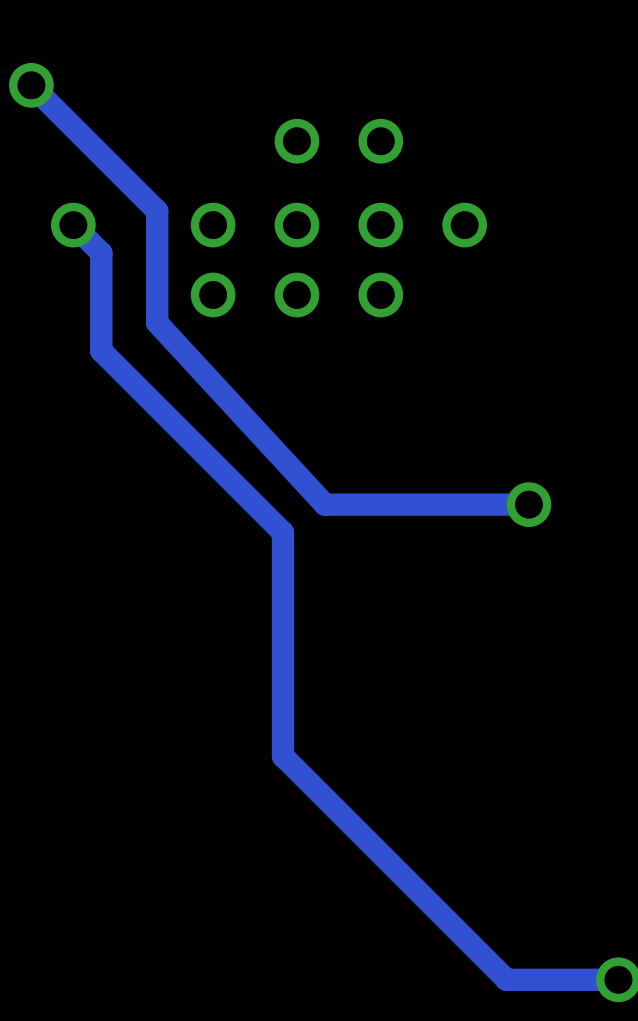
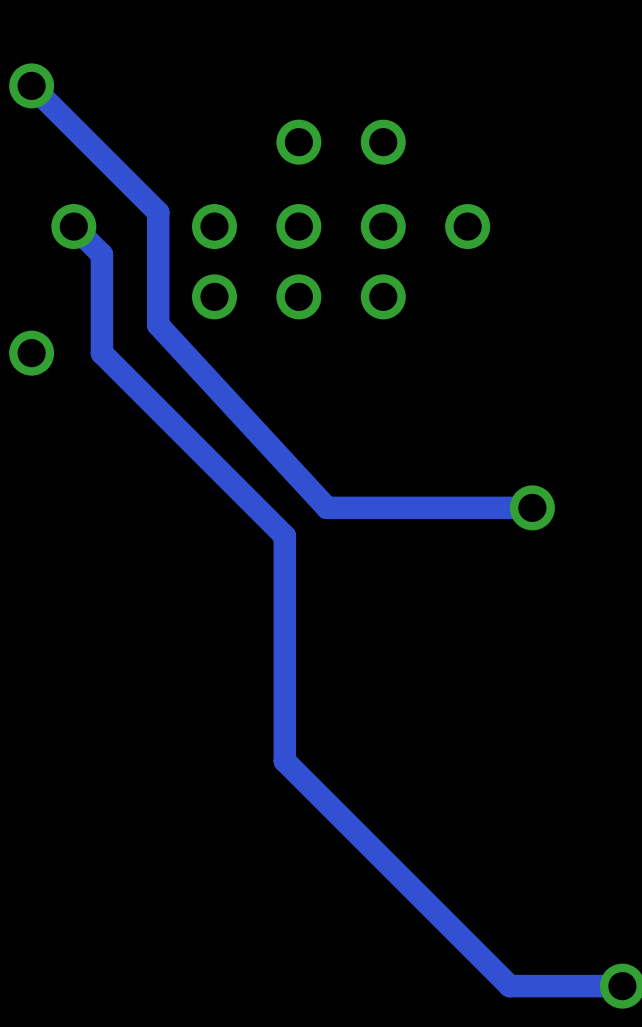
via: none -> (31, 353)

